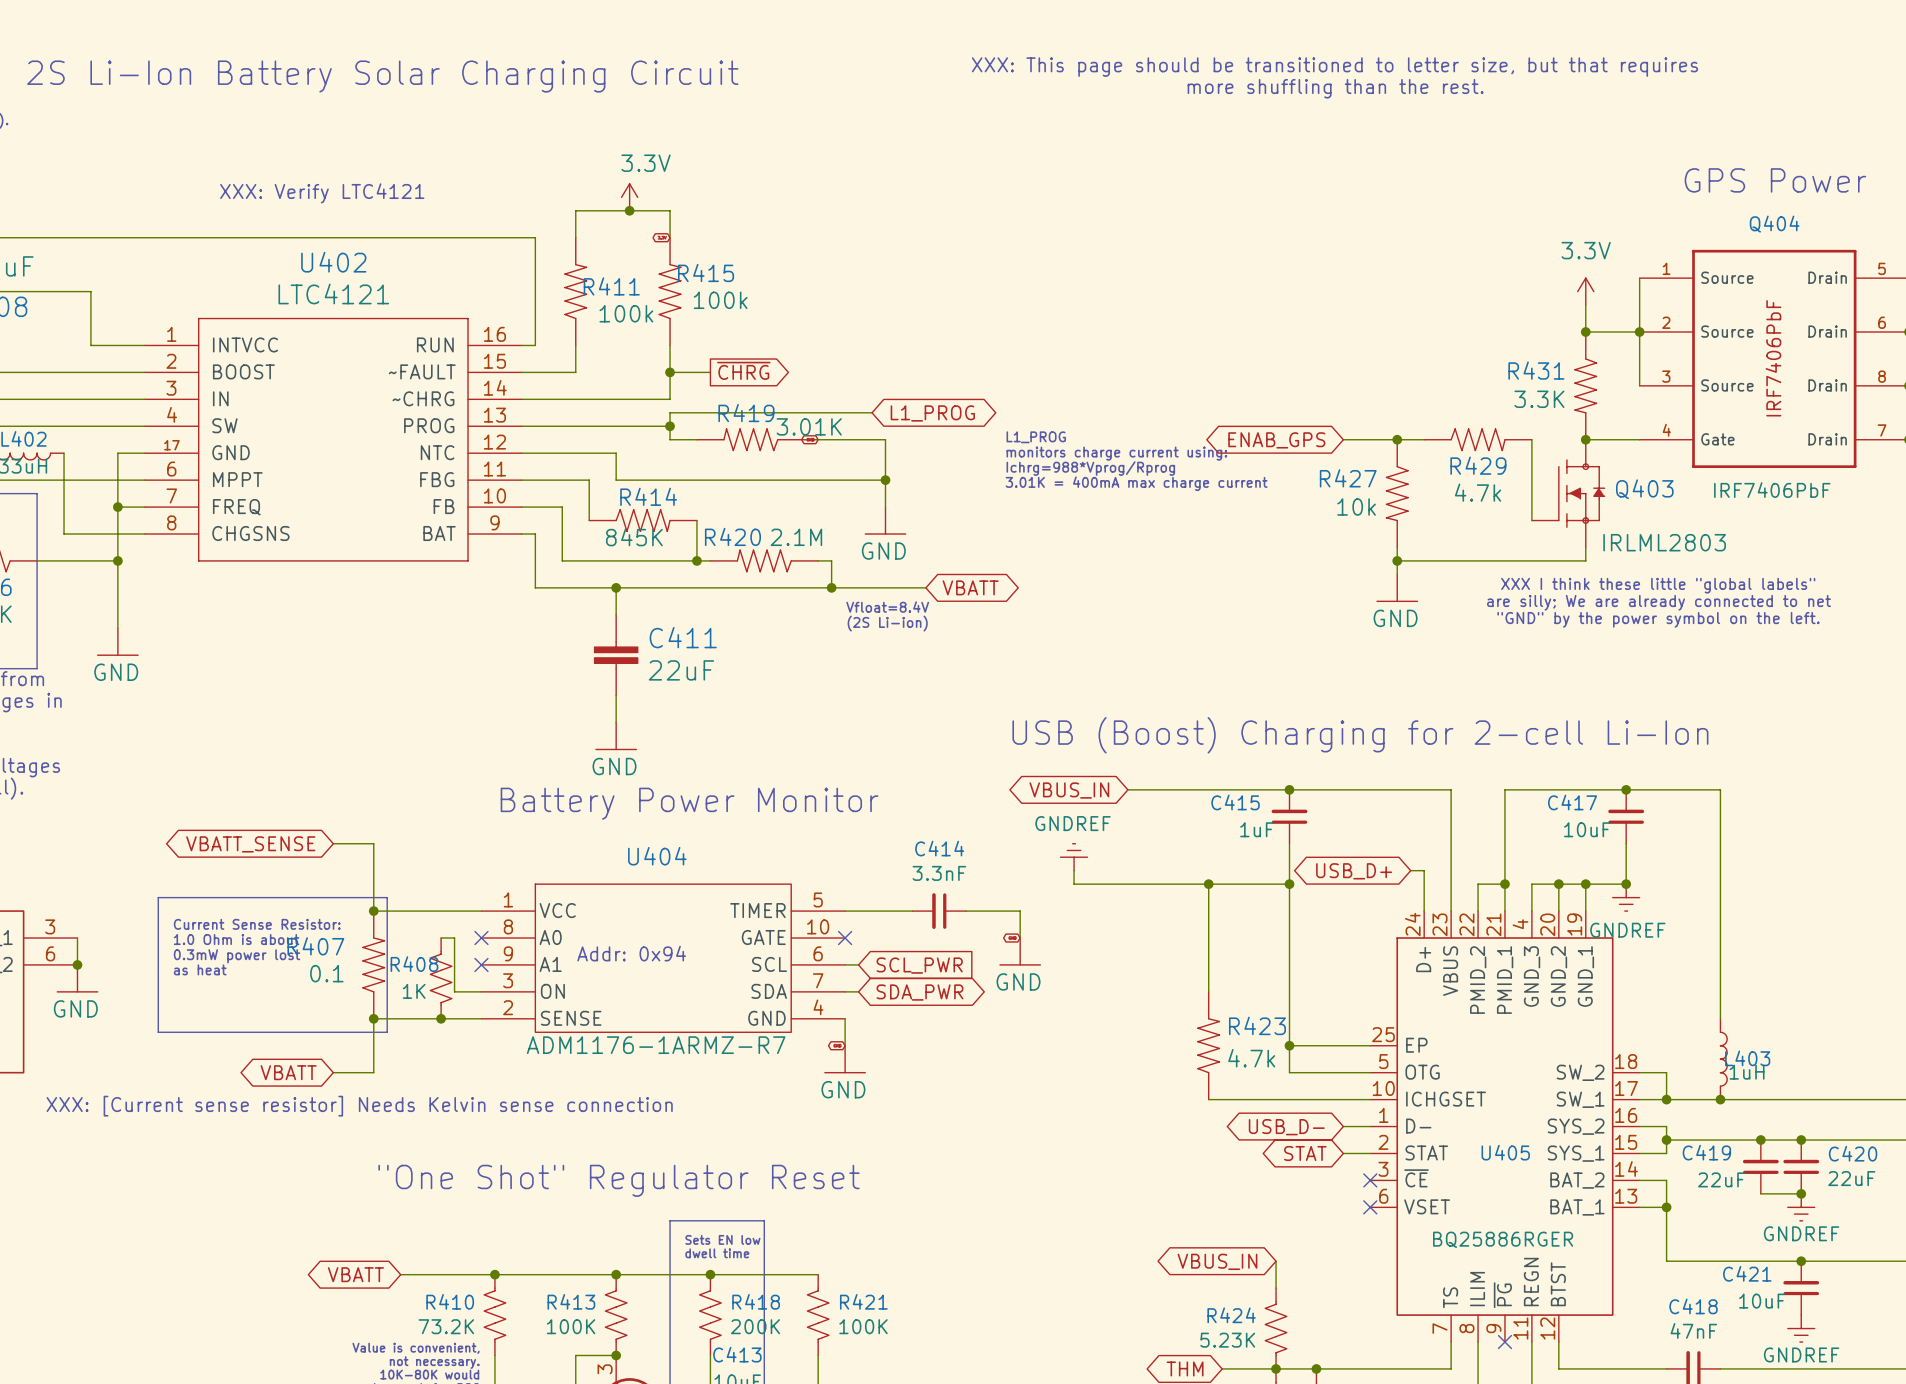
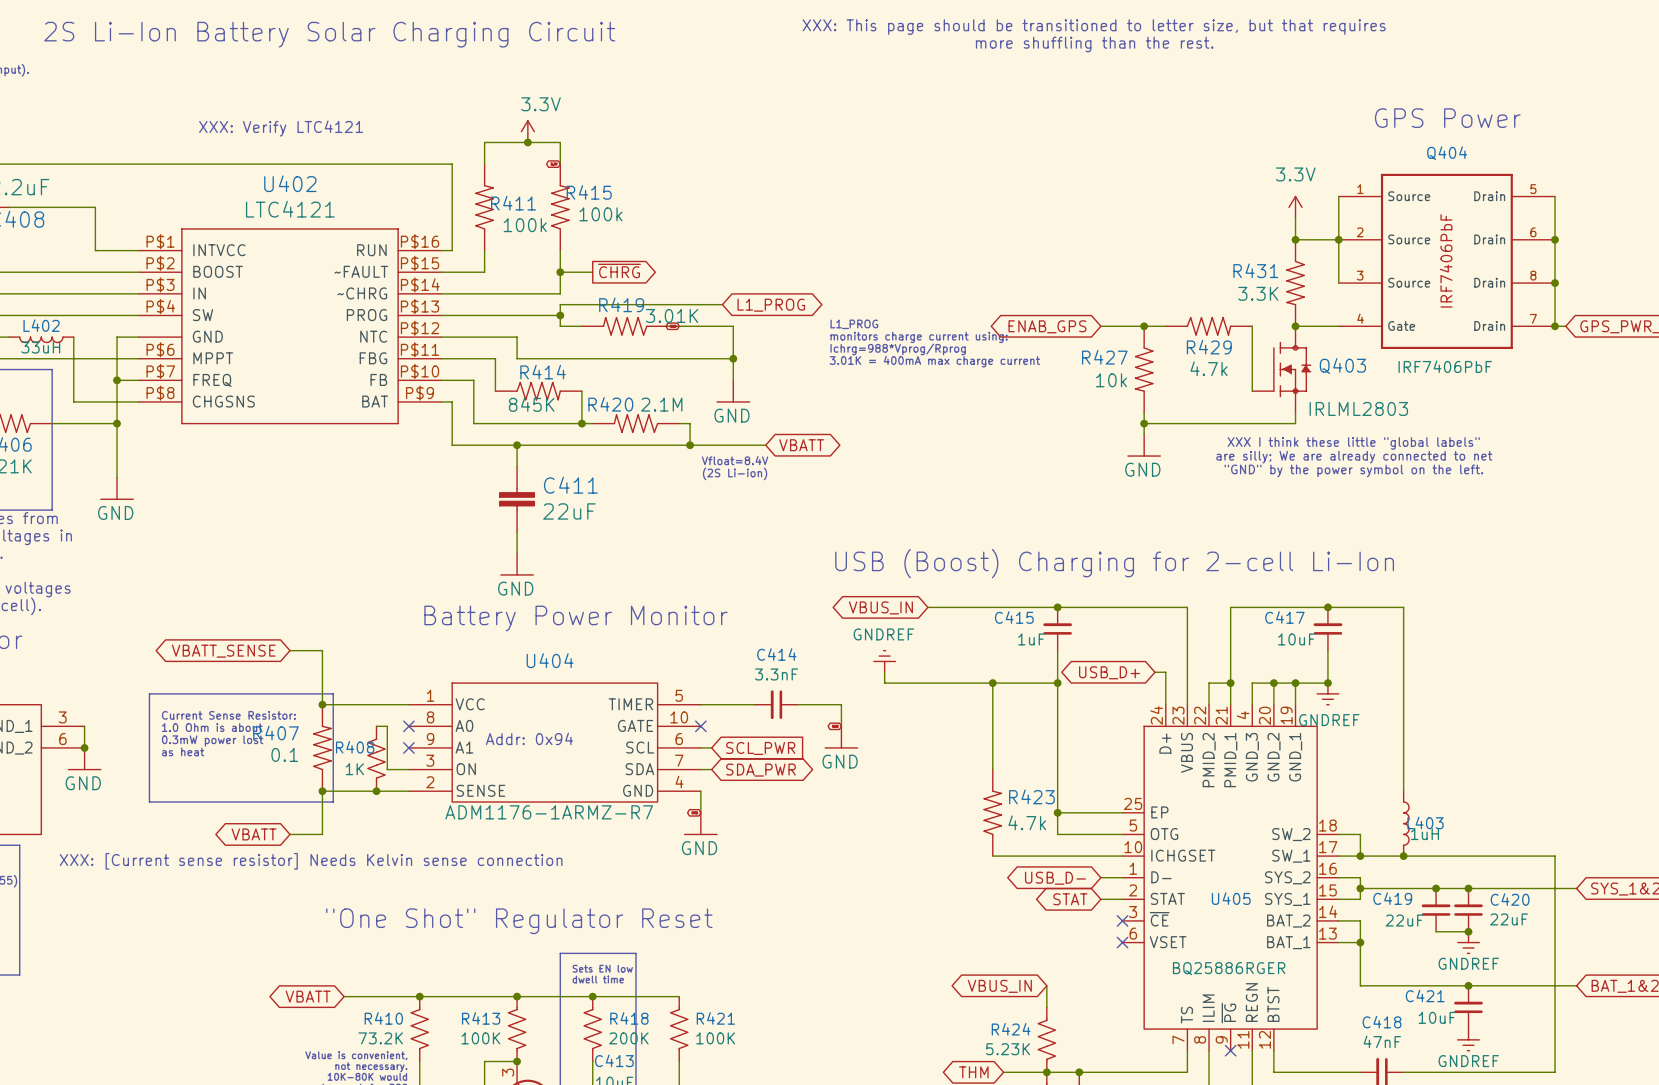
U402 symbol: [144, 318, 522, 561] -> [138, 228, 442, 424]

